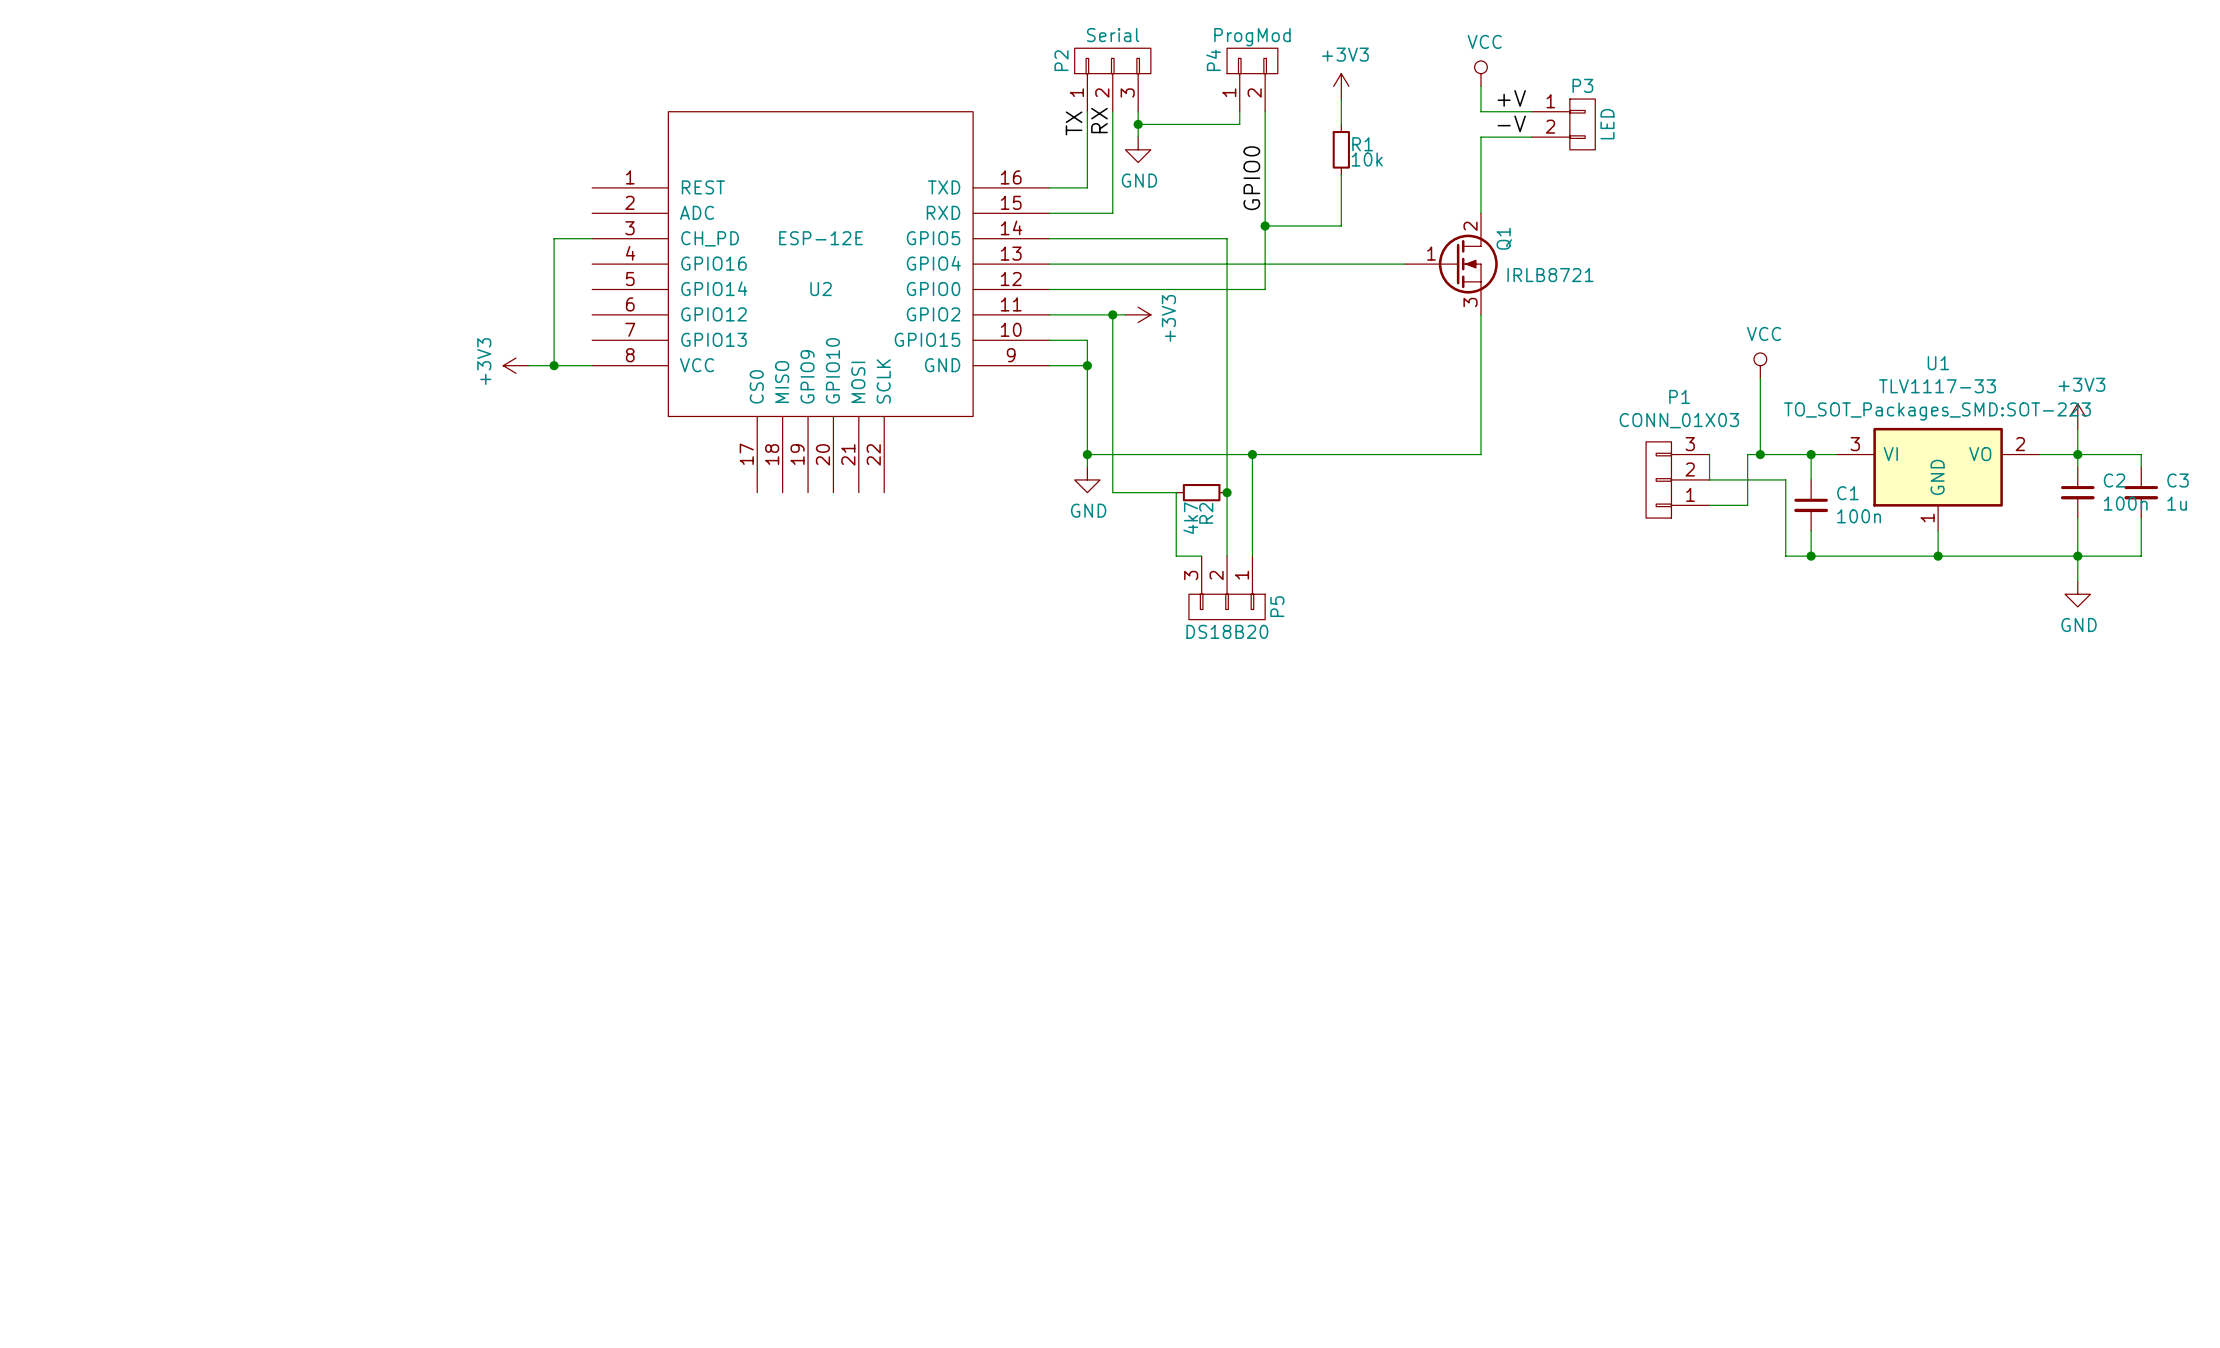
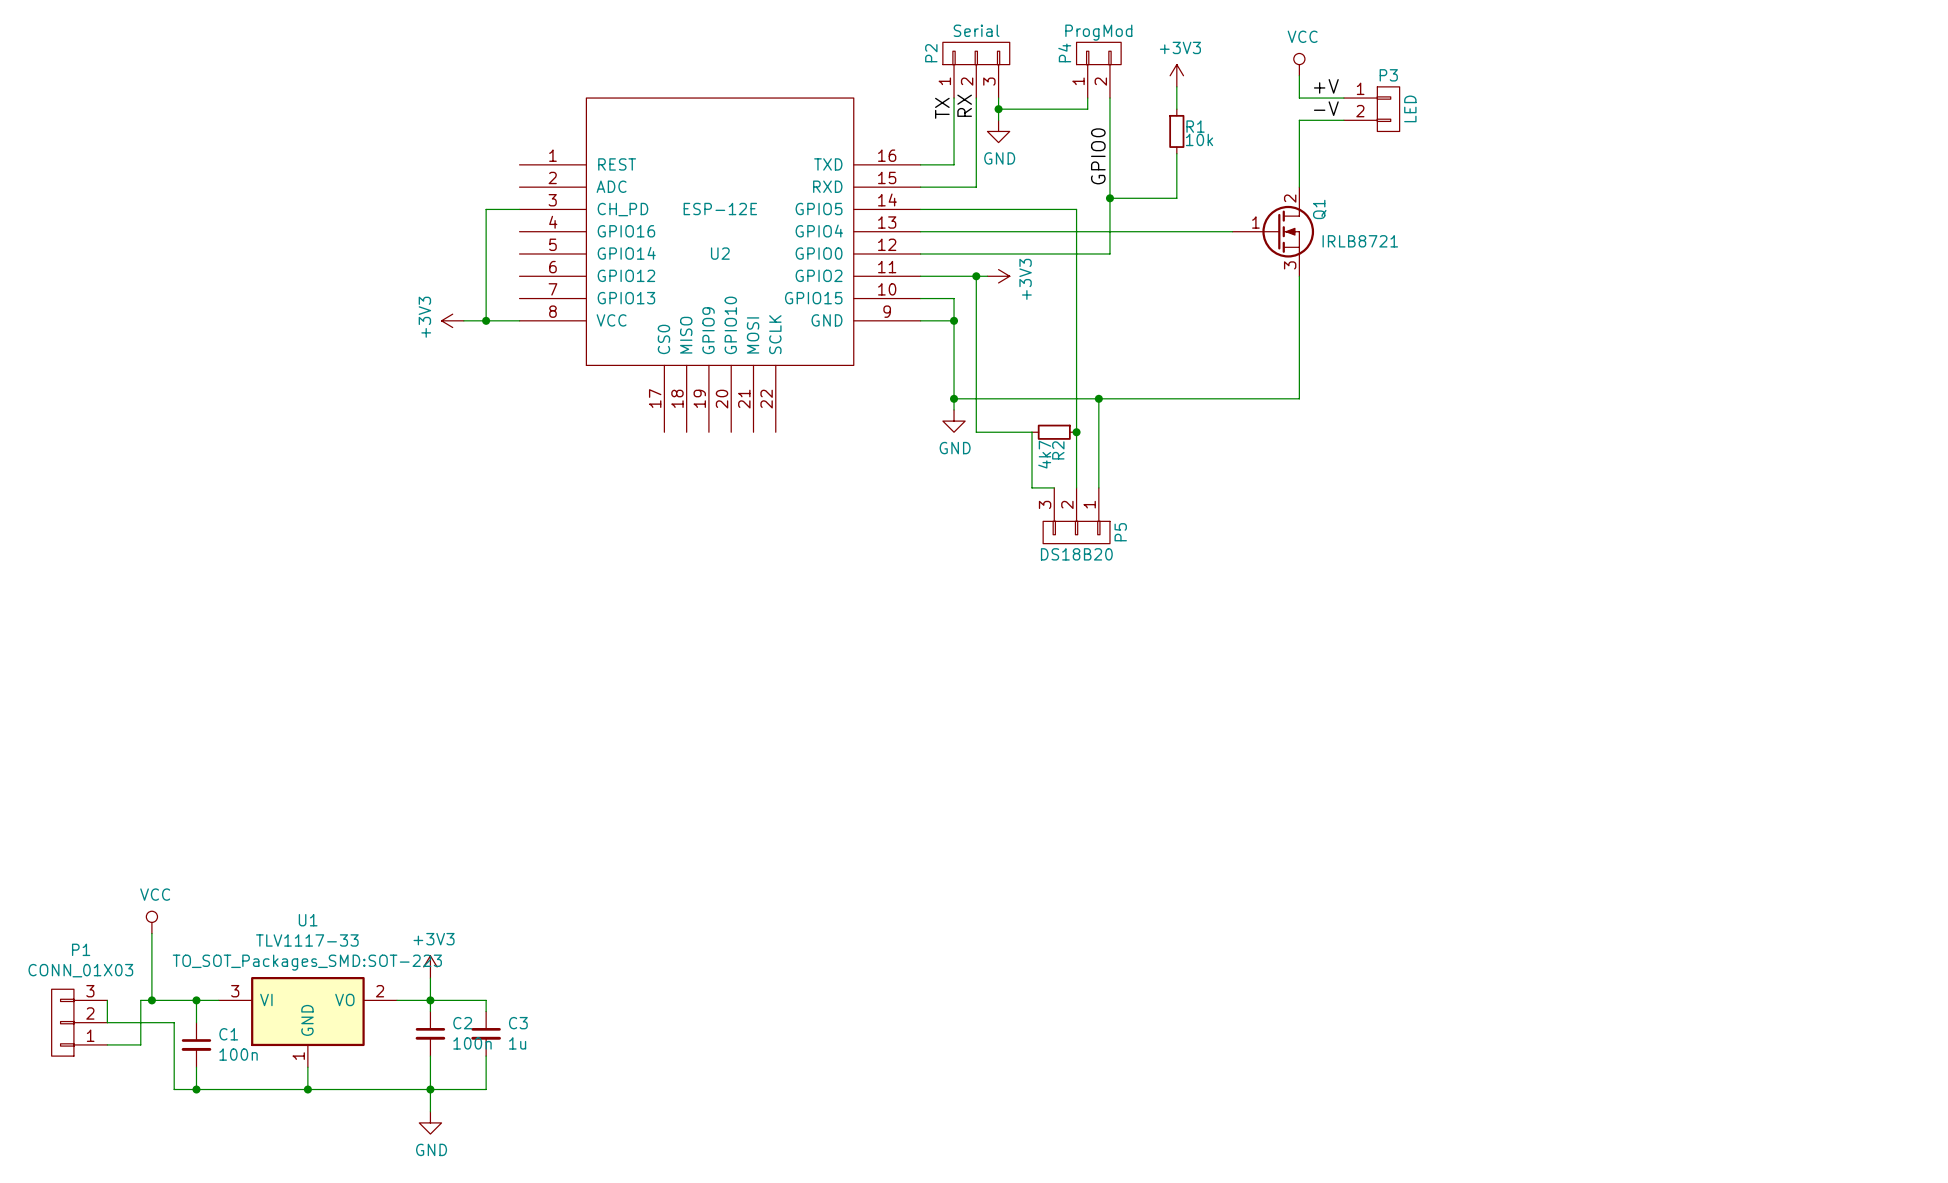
power symbol: VCC (1760, 365) -> none
wire: (1760, 378) (1760, 454) -> none
power symbol: +3V3 (2077, 416) -> none
wire: (2077, 429) (2077, 467) -> none
wire: (1709, 454) (1709, 479) (1785, 479) (1785, 556) (2141, 556) (2141, 518) -> none
junction: (1760, 454) -> none
wire: (1811, 454) (1811, 479) -> none
junction: (1811, 454) -> none
wire: (1836, 454) (1747, 454) (1747, 505) (1709, 505) -> none
wire: (2039, 454) (2141, 454) (2141, 467) -> none
junction: (2077, 454) -> none
P1 position: (1677, 479) -> (79, 1022)
U1 position: (1938, 479) -> (307, 1022)
C2 position: (2077, 492) -> (430, 1033)
C3 position: (2141, 492) -> (486, 1033)
C1 position: (1811, 505) -> (196, 1044)
wire: (2077, 518) (2077, 581) -> none
wire: (1811, 530) (1811, 556) -> none
wire: (1938, 530) (1938, 556) -> none
junction: (1811, 556) -> none
junction: (1938, 556) -> none
junction: (2077, 556) -> none
power symbol: GND (2077, 594) -> none
power symbol: none -> VCC (151, 922)
wire: none -> (151, 933) (151, 1000)
power symbol: none -> +3V3 (430, 966)
wire: none -> (430, 978) (430, 1011)
wire: none -> (107, 1000) (107, 1022) (174, 1022) (174, 1089) (486, 1089) (486, 1056)
junction: none -> (151, 1000)
wire: none -> (196, 1000) (196, 1022)
junction: none -> (196, 1000)
wire: none -> (218, 1000) (140, 1000) (140, 1044) (107, 1044)
wire: none -> (397, 1000) (486, 1000) (486, 1011)
junction: none -> (430, 1000)
wire: none -> (430, 1056) (430, 1111)
wire: none -> (196, 1067) (196, 1089)
wire: none -> (307, 1067) (307, 1089)
junction: none -> (196, 1089)
junction: none -> (307, 1089)
junction: none -> (430, 1089)
power symbol: none -> GND (430, 1122)

